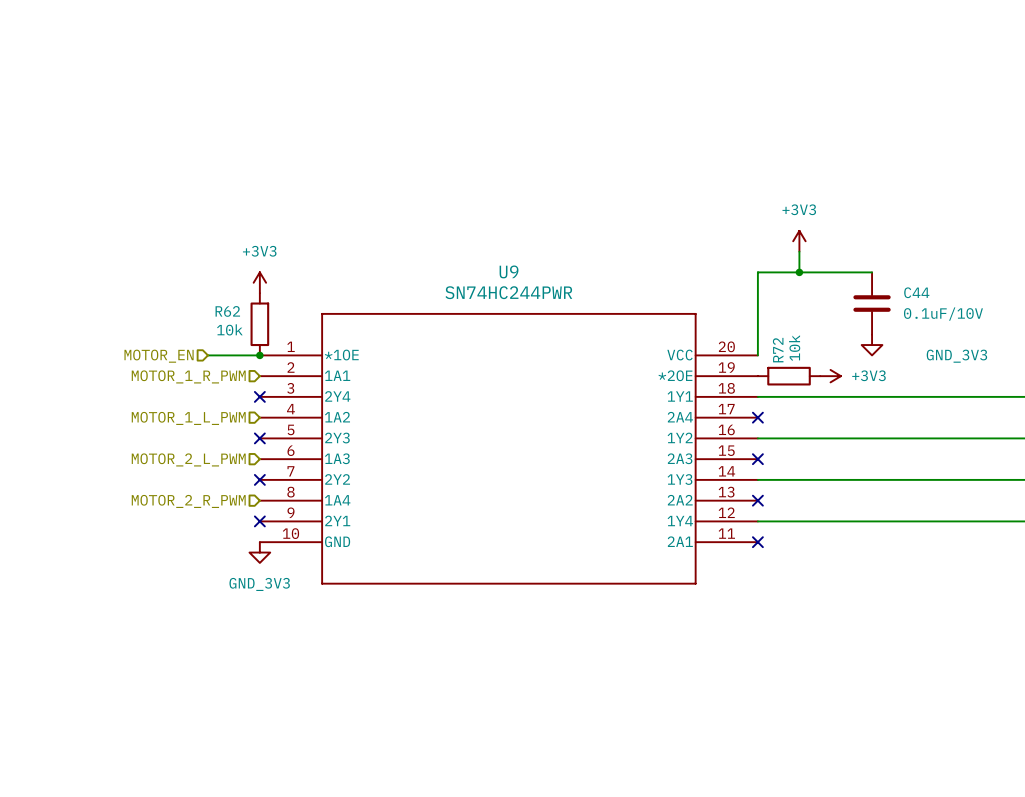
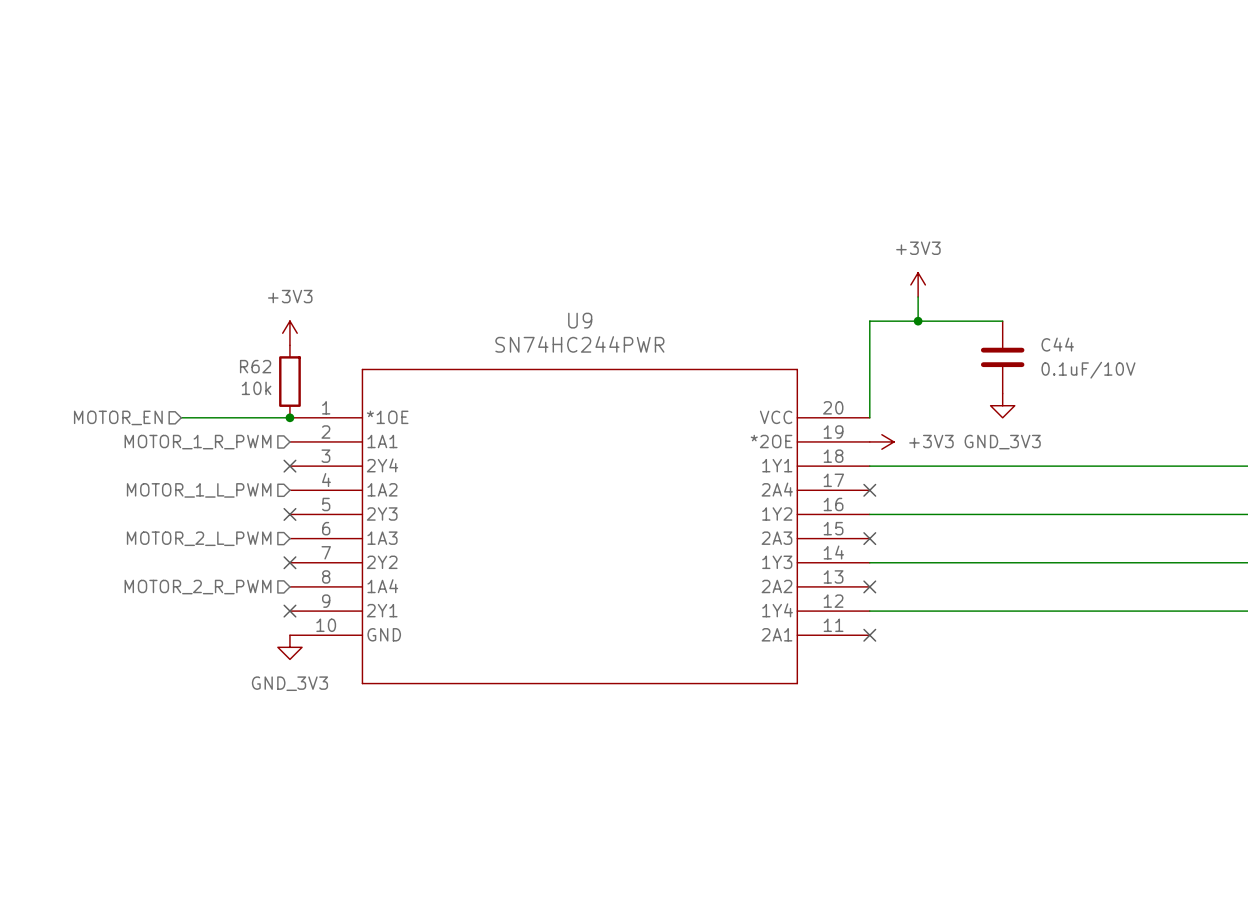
wire: none -> (181, 417) (229, 417)
hierarchical label position: MOTOR_EN (159, 356) -> MOTOR_EN (118, 417)
power symbol text position: GND_3V3 (956, 356) -> GND_3V3 (1002, 442)
R72: 10k (789, 376) -> none
power symbol position: +3V3 (830, 376) -> +3V3 (881, 441)

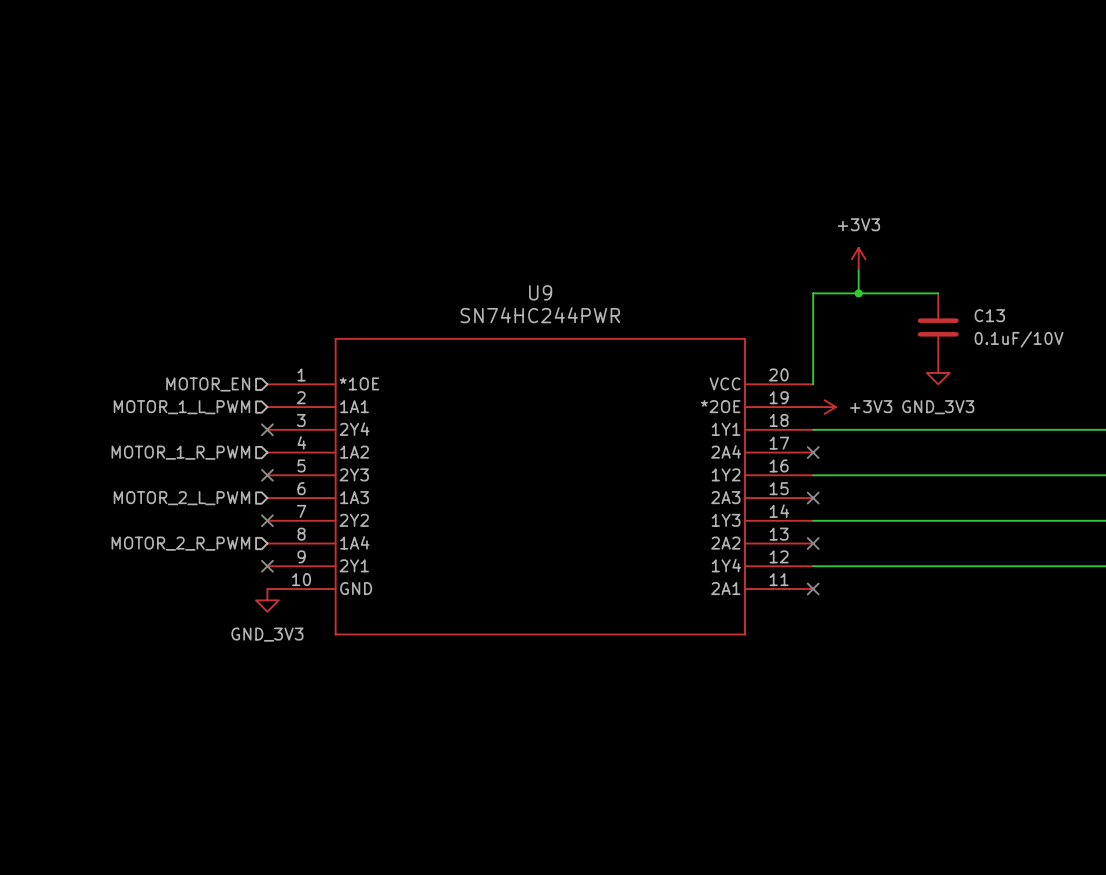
power symbol: +3V3 (289, 333) -> none
C44 name: C44 (1057, 344) -> C13 (989, 315)
R62: 10k (289, 381) -> none
hierarchical label position: MOTOR_EN (118, 417) -> MOTOR_EN (208, 384)
wire: (181, 417) (289, 417) -> none
junction: (289, 417) -> none
hierarchical label: MOTOR_1_R_PWM (198, 442) -> MOTOR_1_L_PWM (181, 407)
hierarchical label: MOTOR_1_L_PWM (199, 490) -> MOTOR_1_R_PWM (180, 452)

